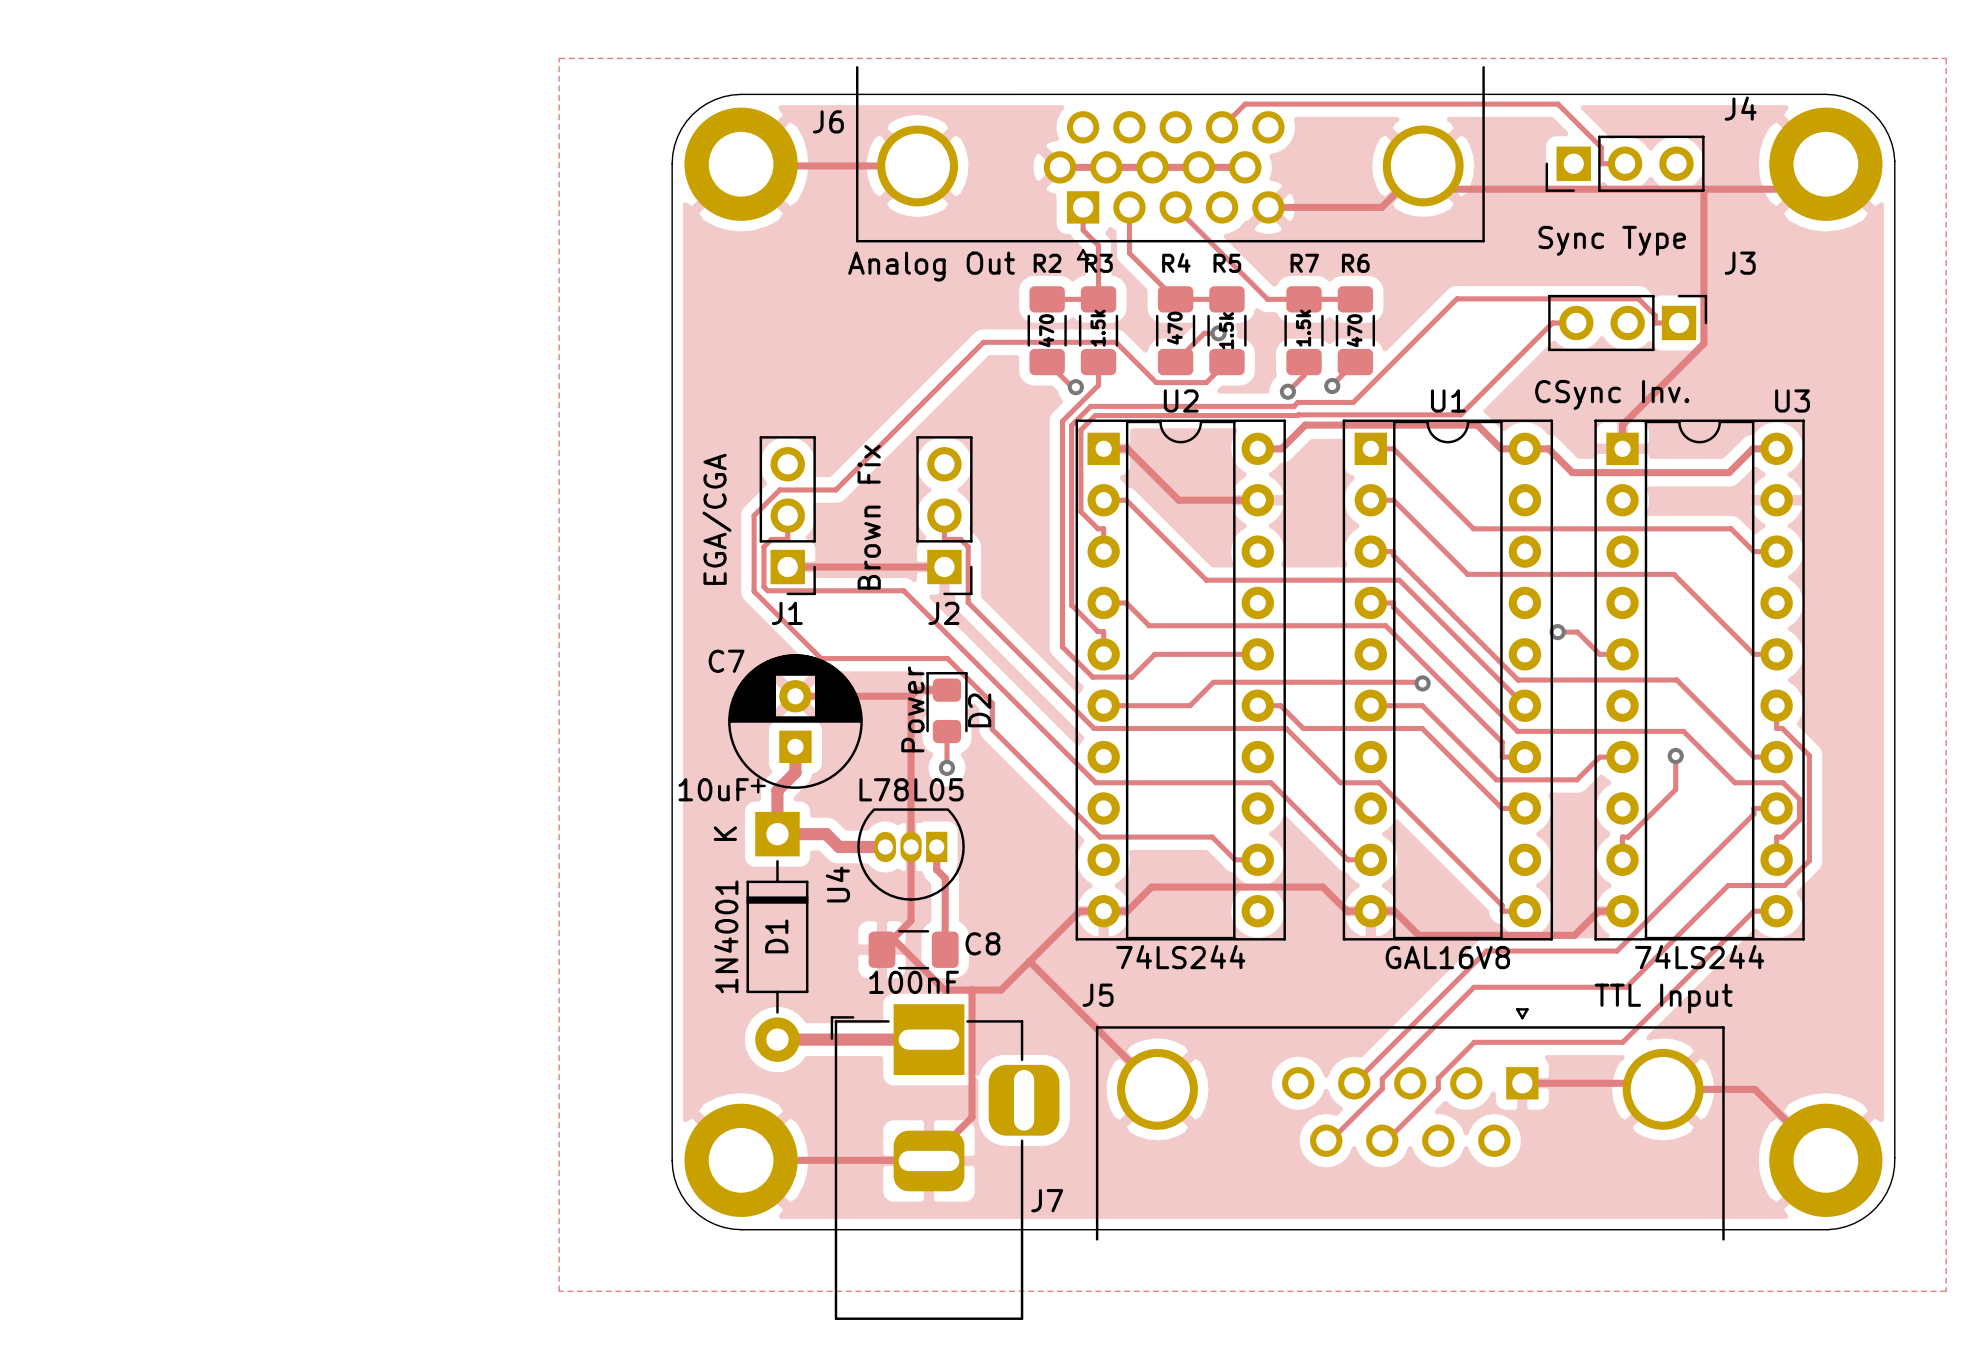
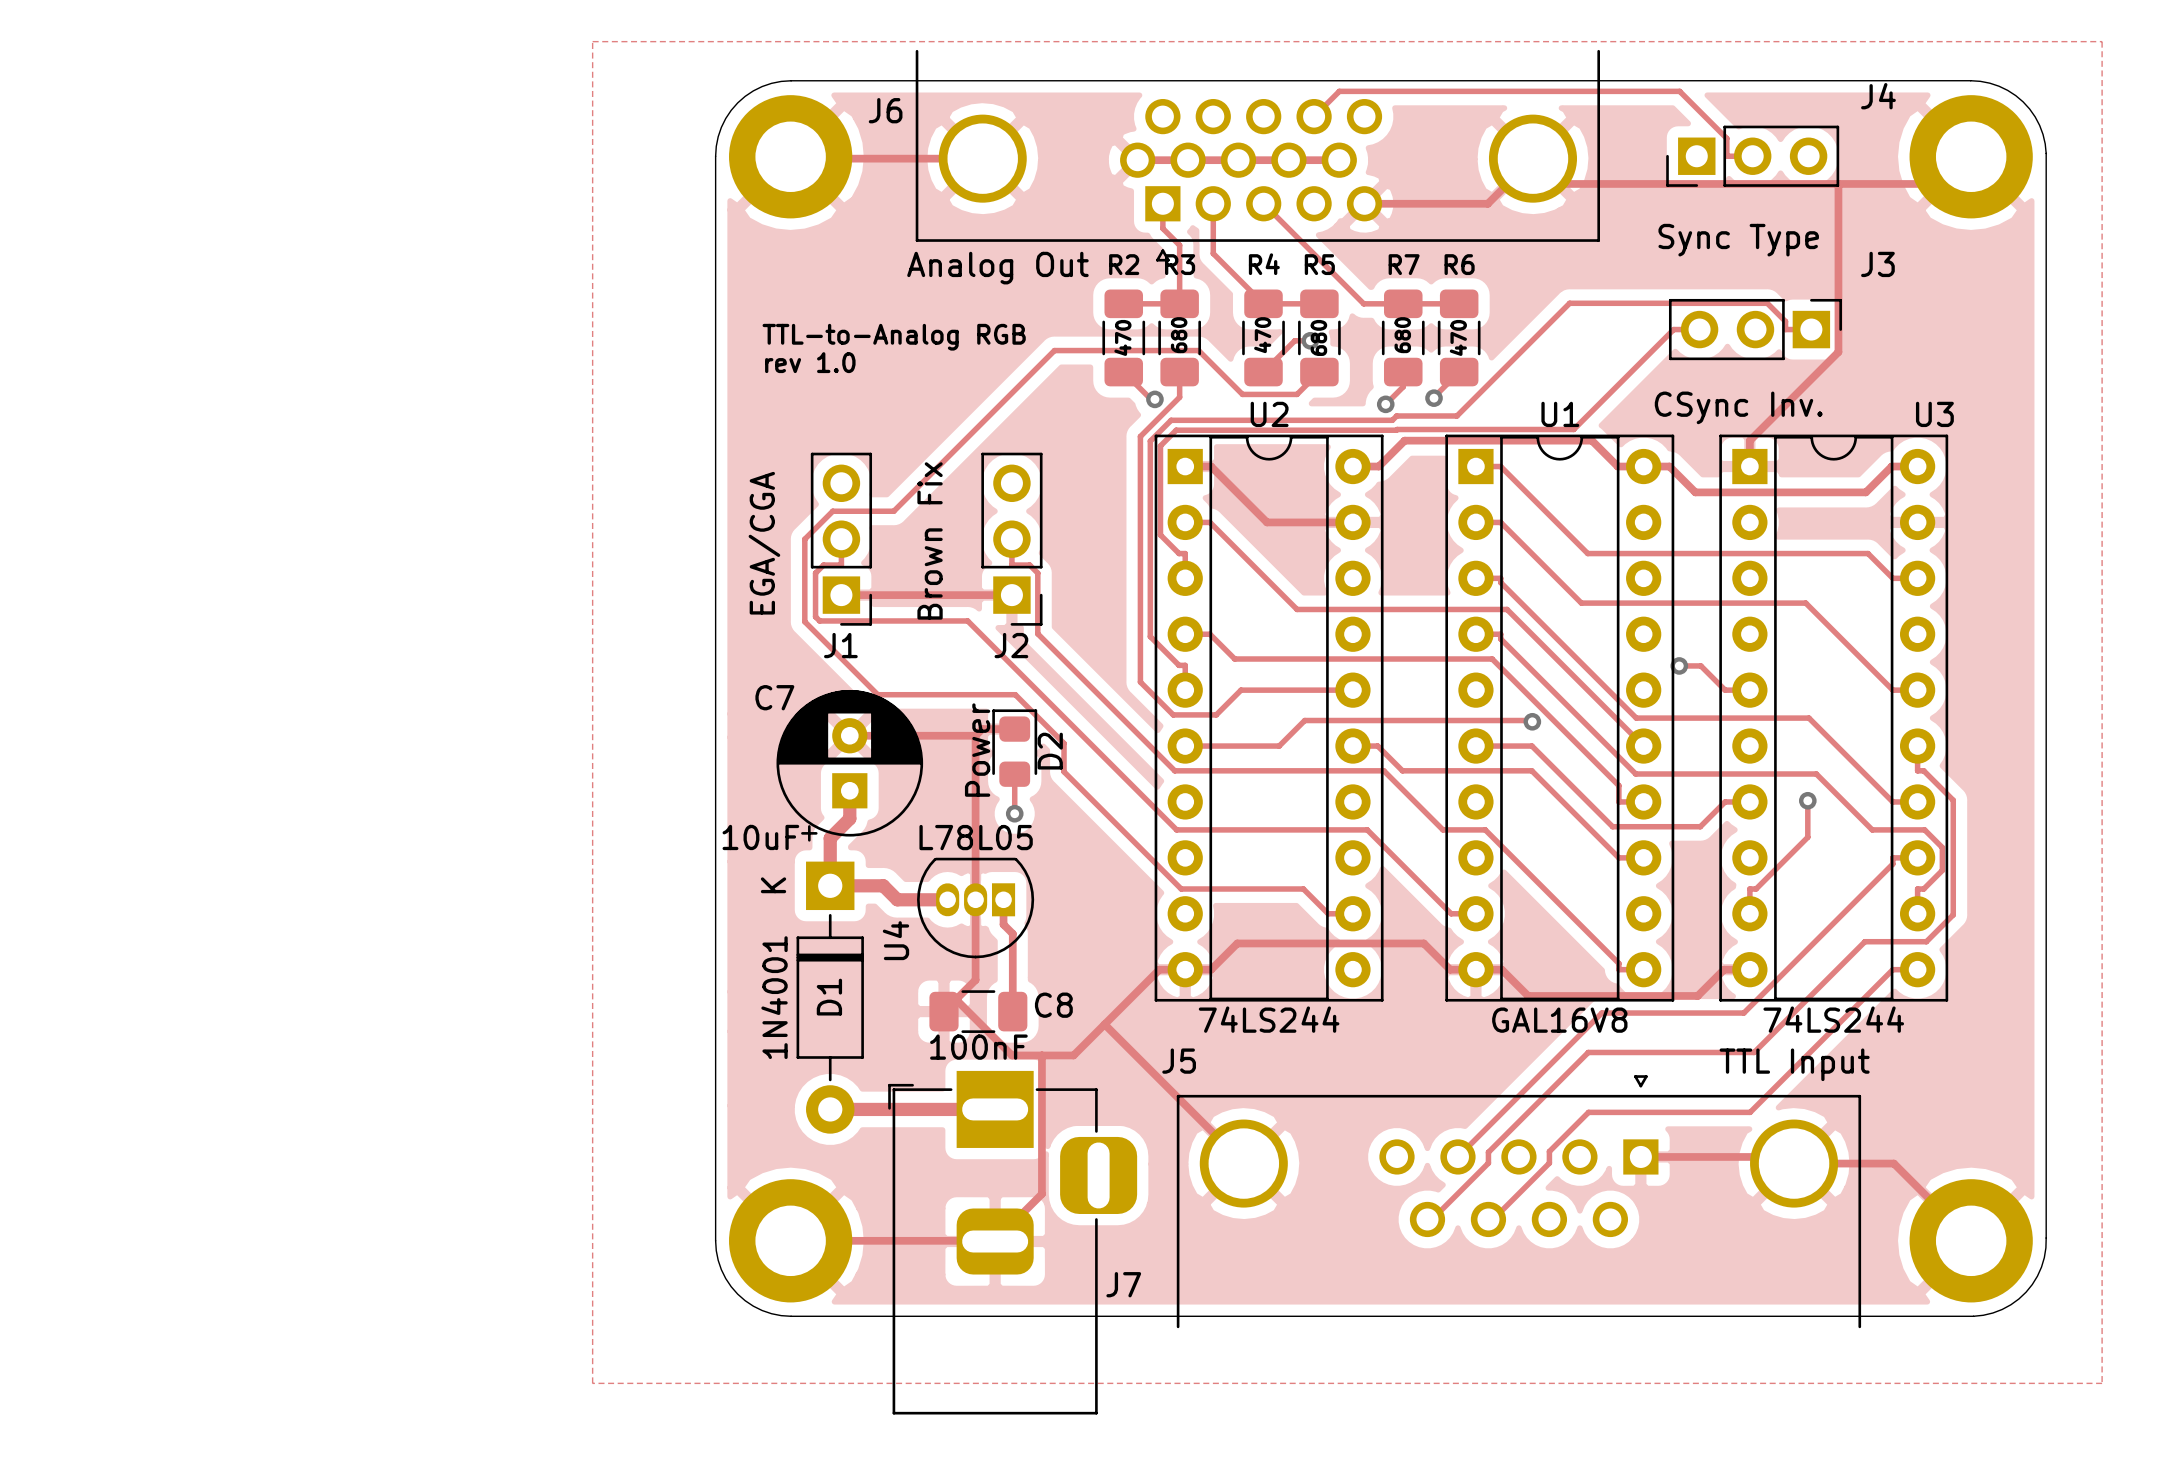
R3 value: 1.5k (1098, 328) -> 680 (1179, 335)
R7 value: 1.5k (1303, 328) -> 680 (1402, 335)
text: none -> TTL-to-Analog RGB (894, 337)
R5 value: 1.5k (1226, 330) -> 680 (1318, 337)
text: none -> rev 1.0 (810, 362)

